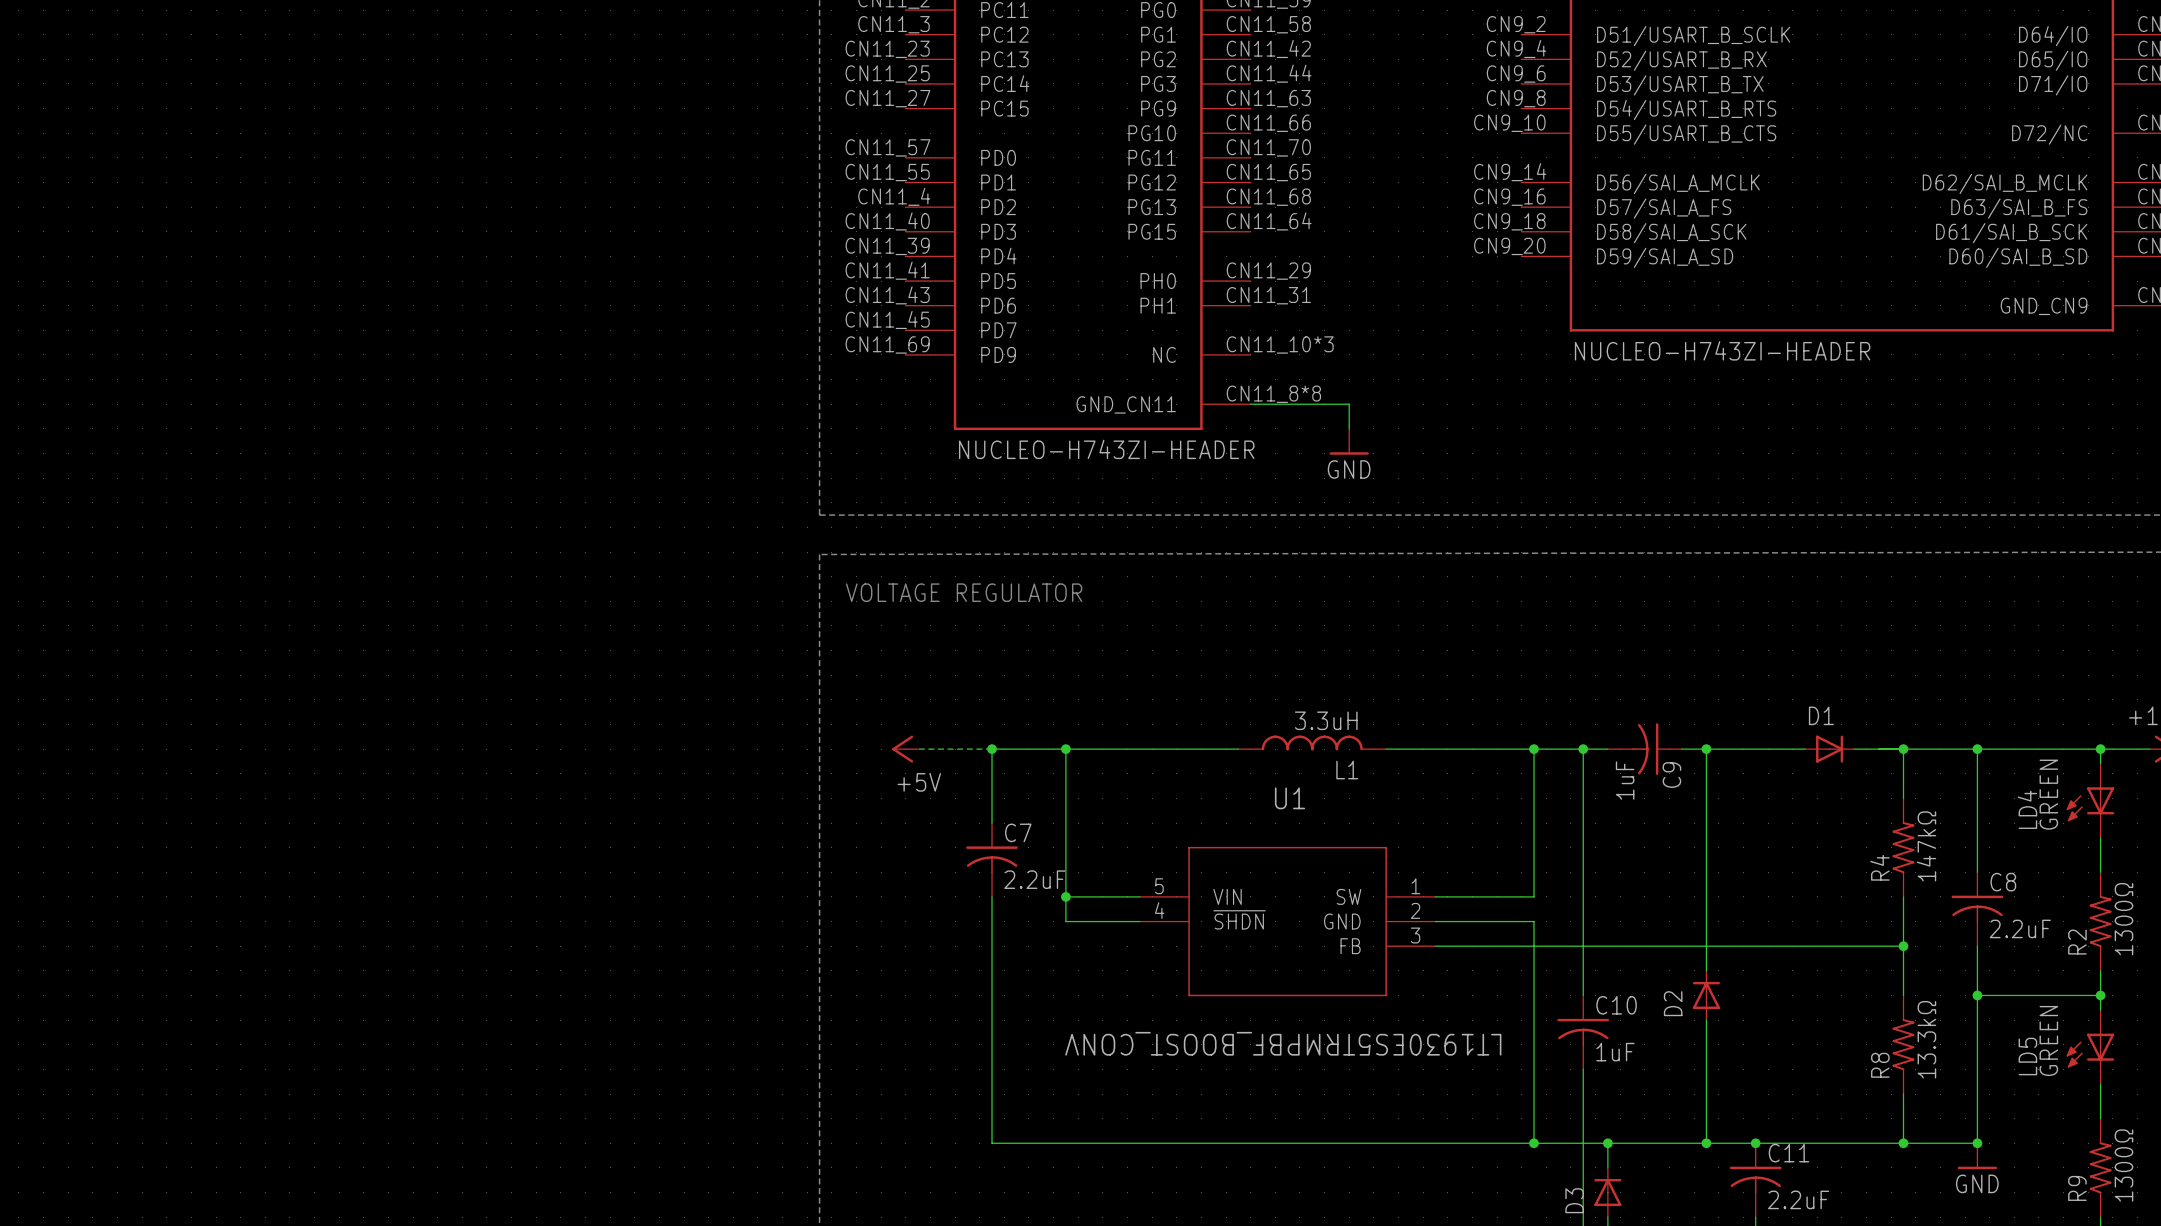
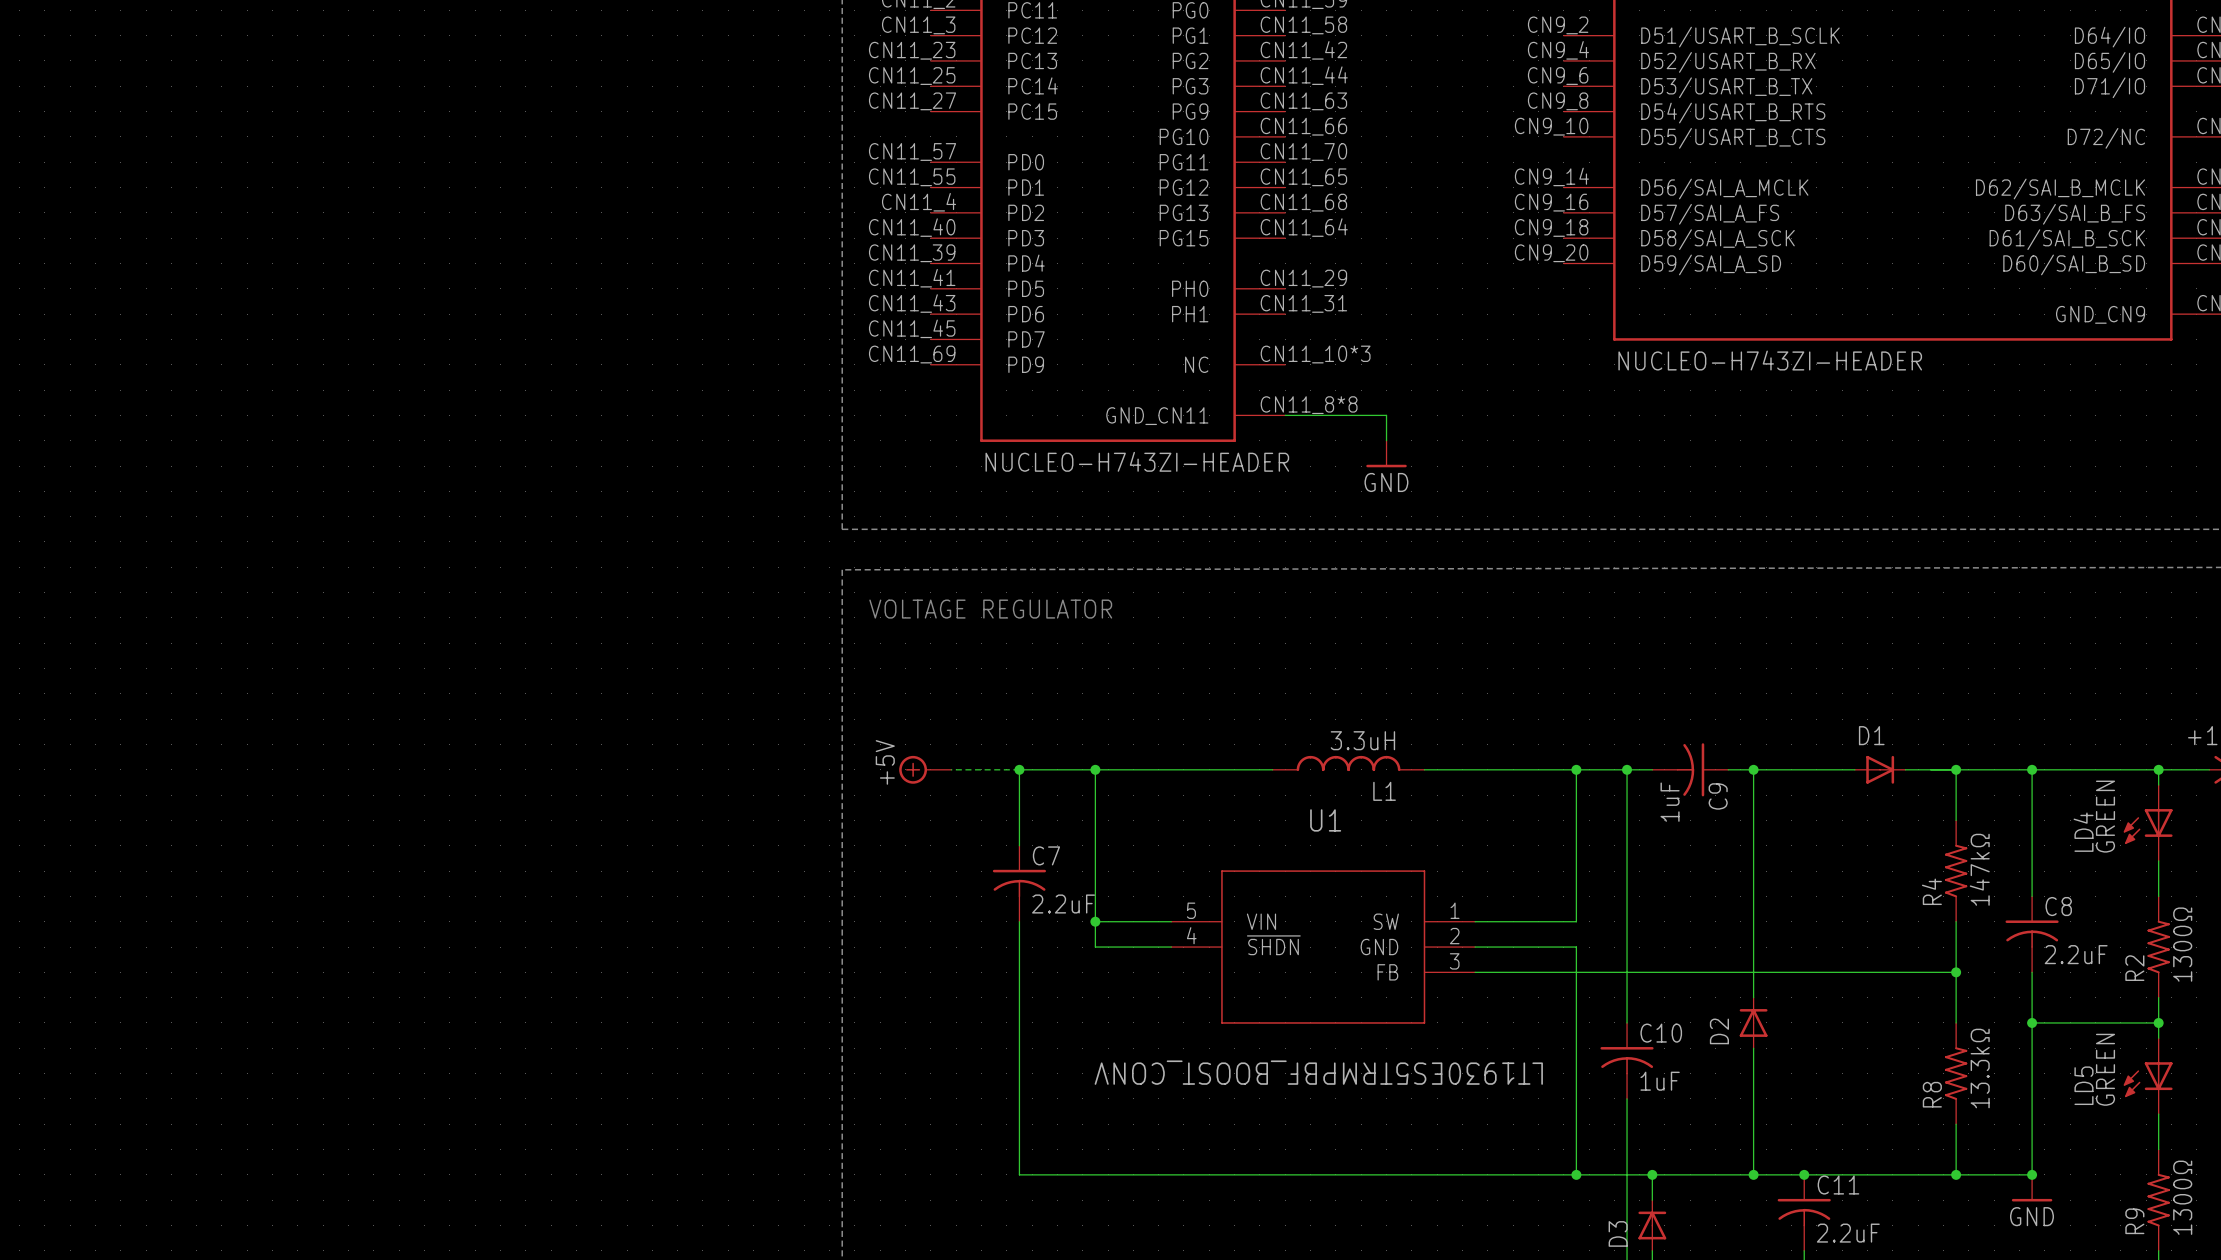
power symbol shape: [892, 735, 919, 763] -> [899, 755, 952, 784]
power symbol text position: +5V (919, 782) -> +5V (885, 762)

